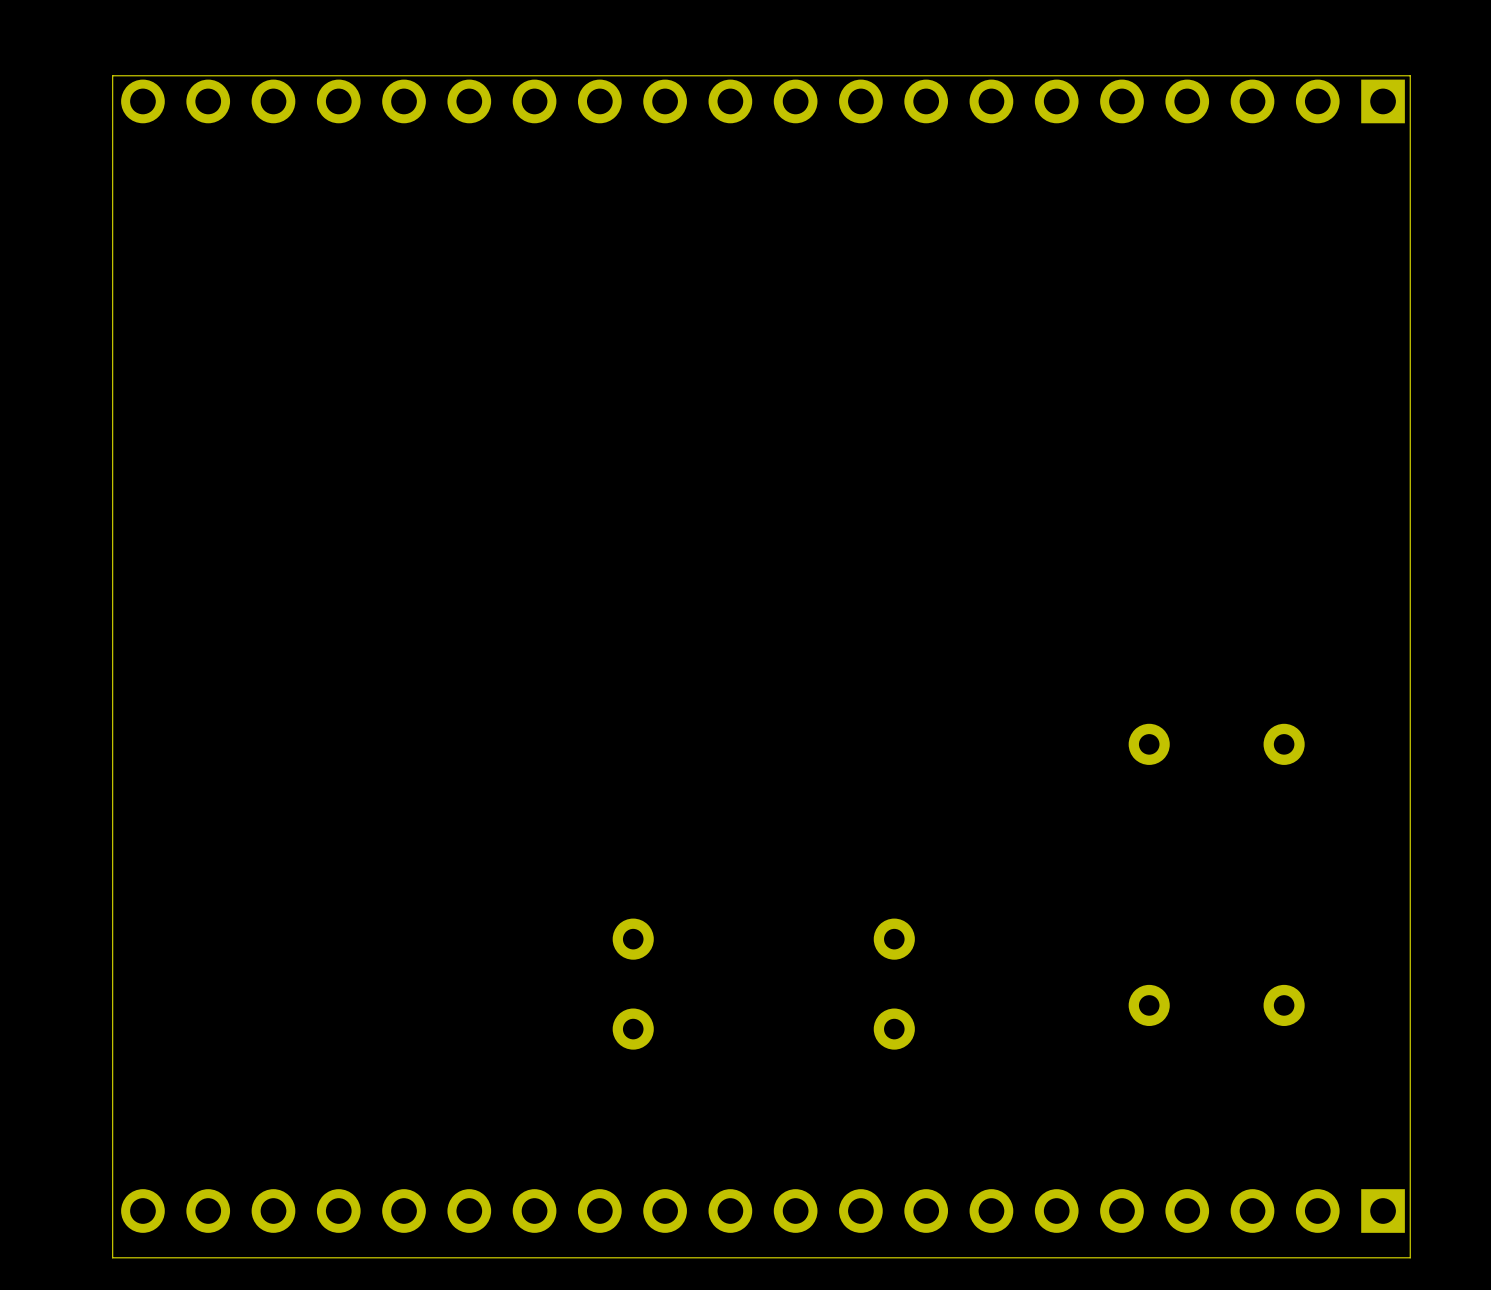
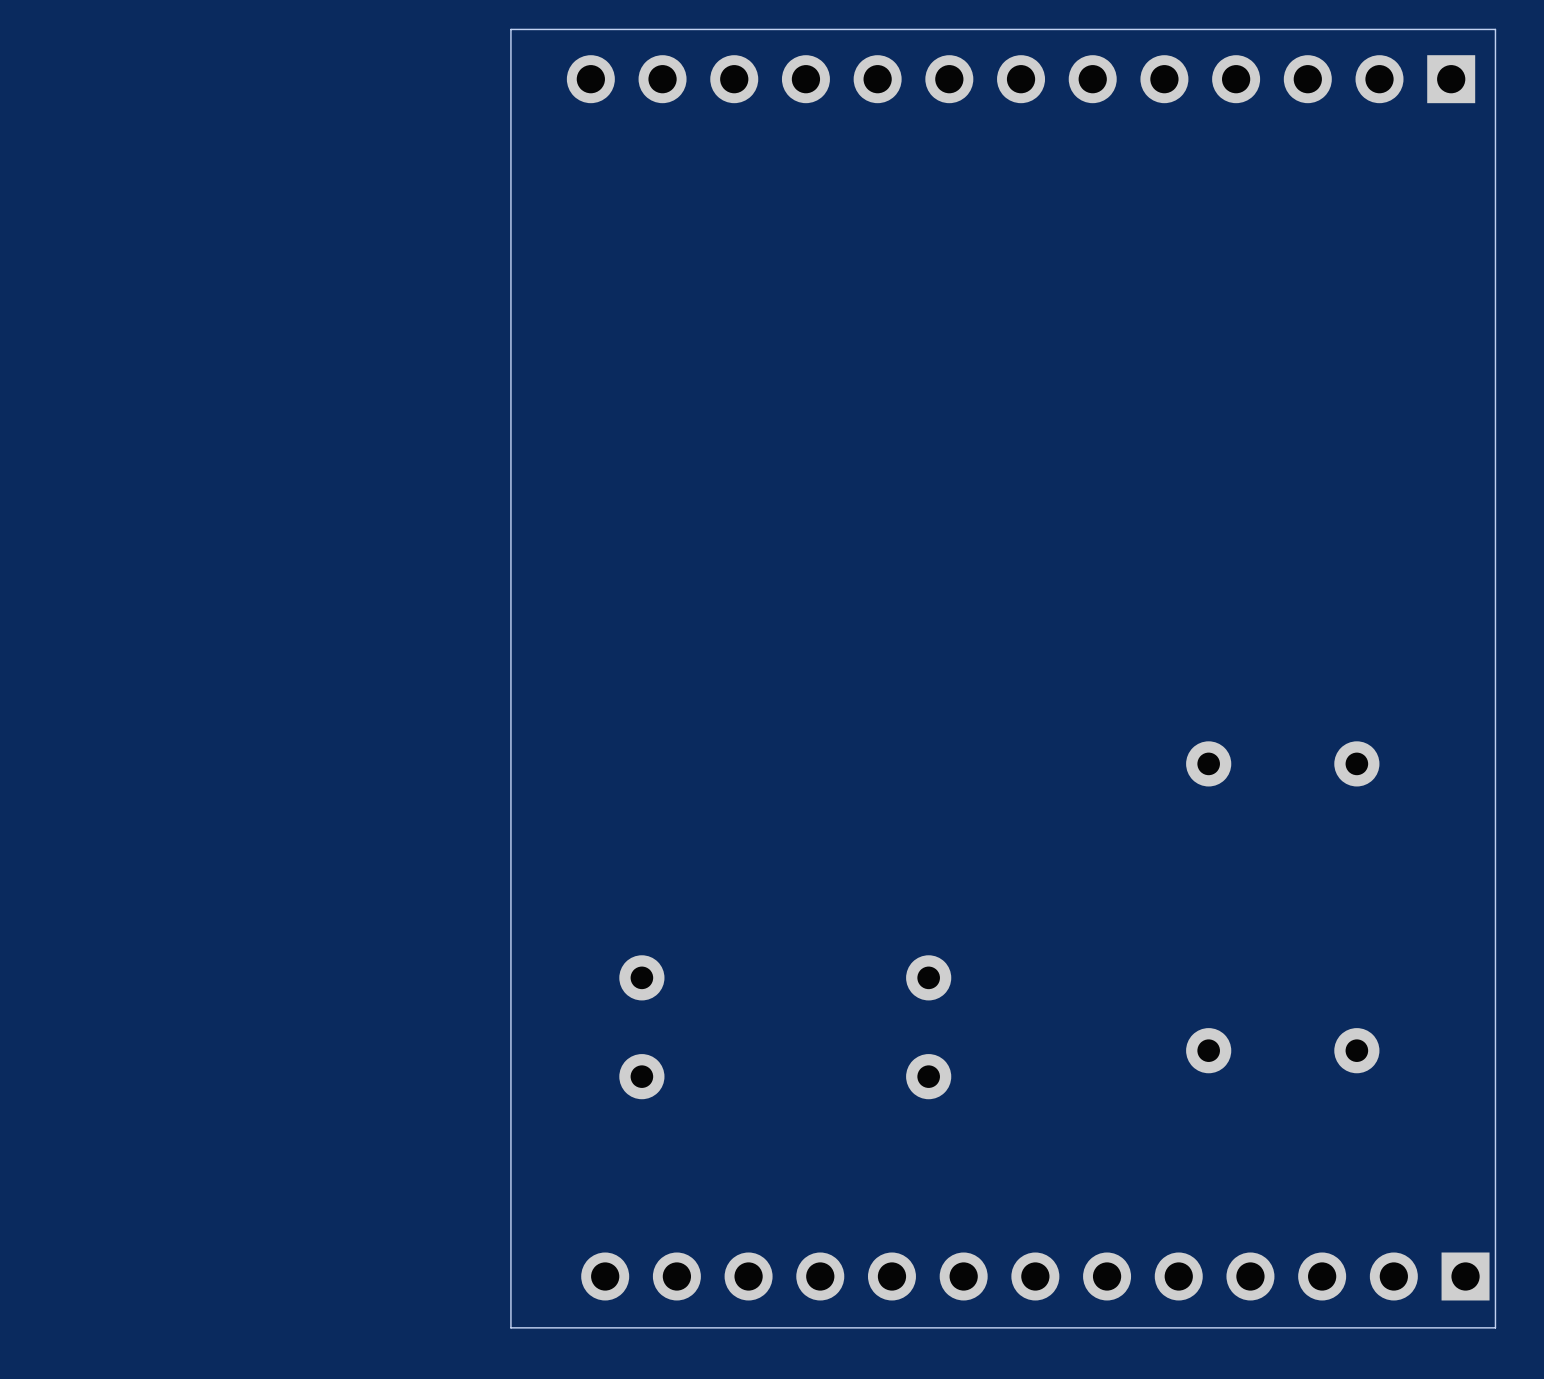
board edge: (514, 75) (112, 75) (112, 1257) (514, 1257) -> (510, 29) (510, 1327)
part: (763, 101) -> none
part: none -> (1021, 79)
part: (763, 1211) -> none

